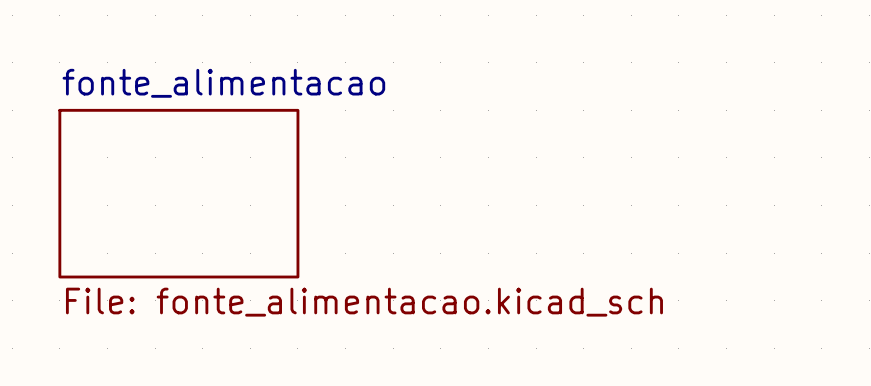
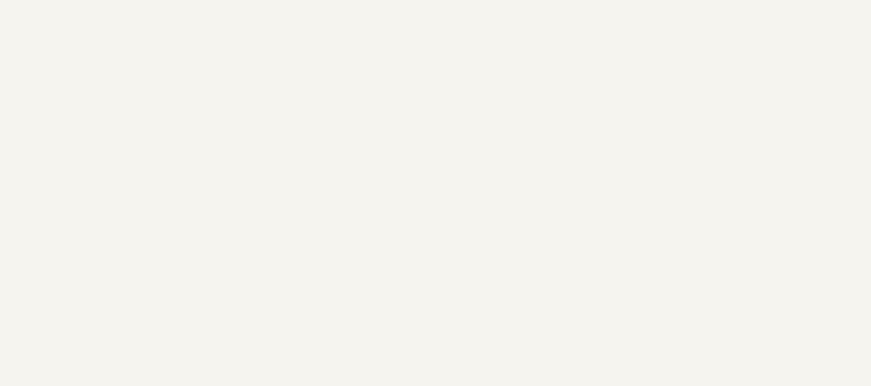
sheet fonte_alimentacao: File: fonte_alimentacao.kicad_sch (178, 193) -> none

